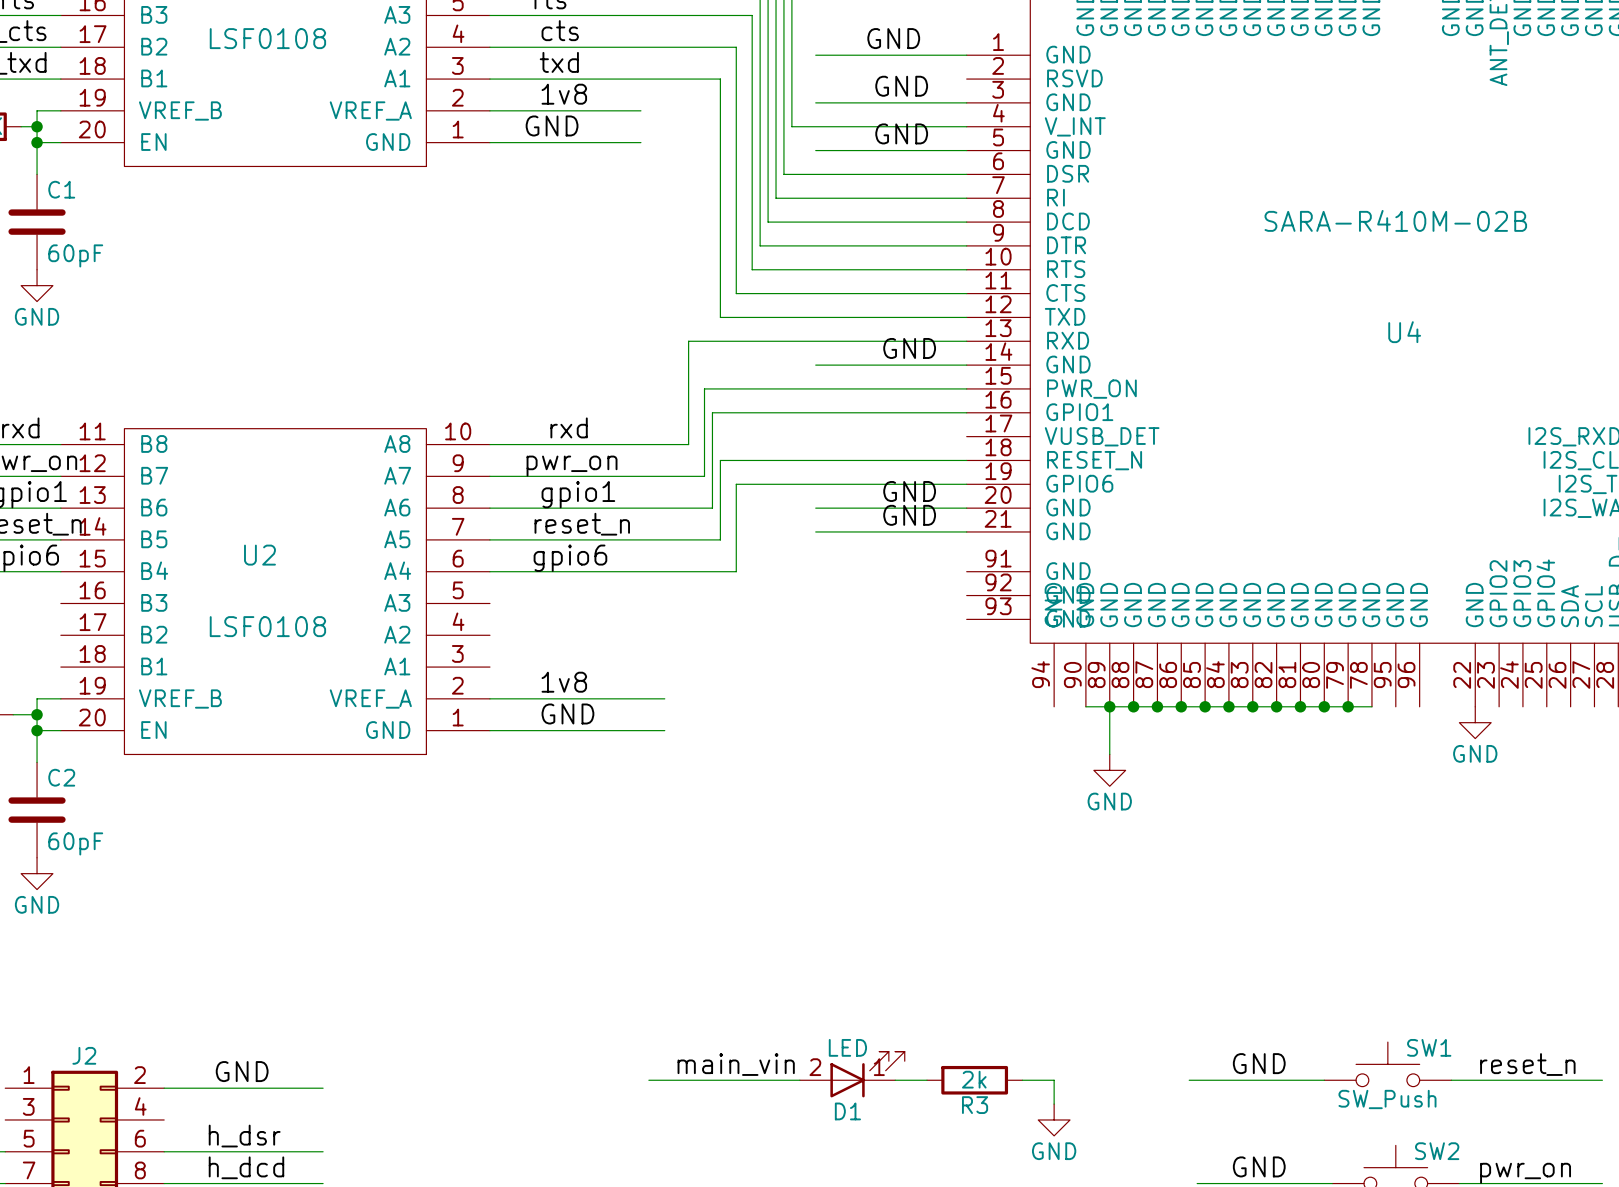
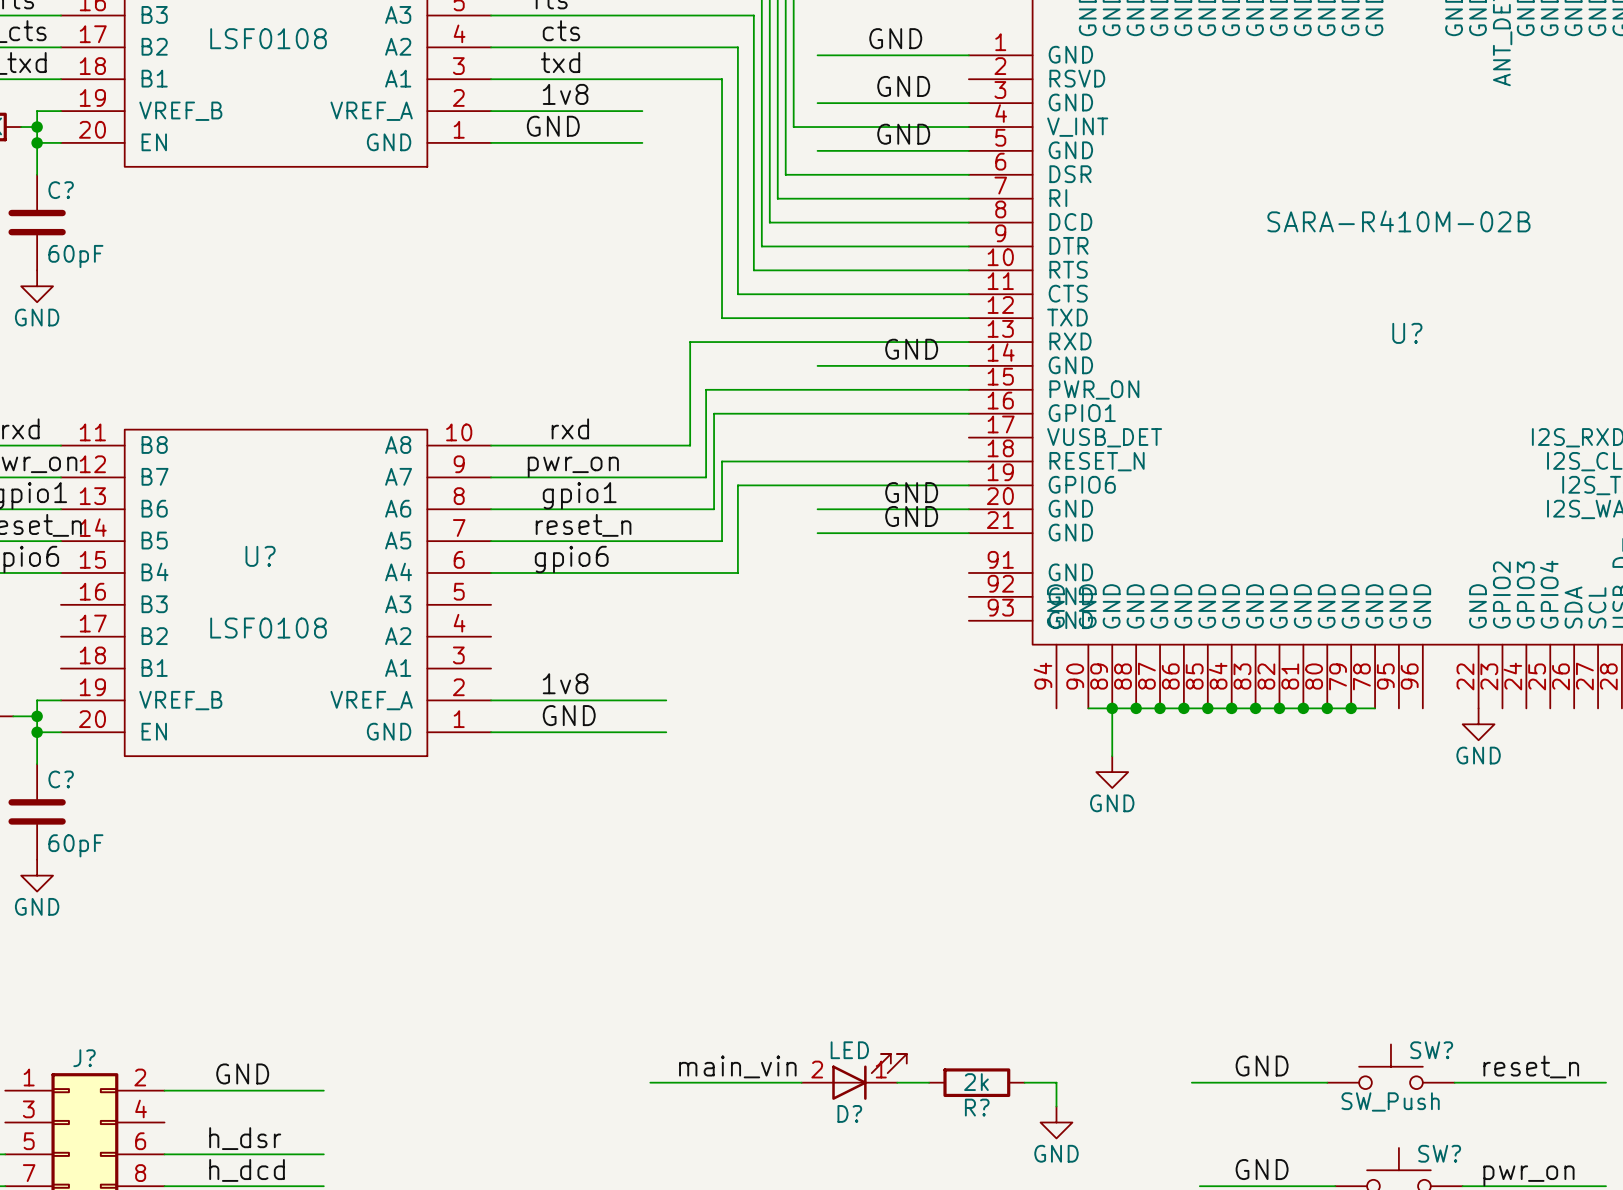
C1 name: C1 (61, 189) -> C? (61, 190)
U4 name: U4 (1404, 332) -> U? (1407, 333)
U2 name: U2 (259, 555) -> U? (260, 556)
C2 name: C2 (61, 777) -> C? (61, 779)
SW1 name: SW1 (1429, 1047) -> SW? (1431, 1050)
J2 name: J2 (84, 1055) -> J? (84, 1058)
R3 name: R3 (975, 1105) -> R? (977, 1107)
D1 name: D1 (847, 1111) -> D? (849, 1113)
SW2 name: SW2 (1437, 1151) -> SW? (1439, 1153)

